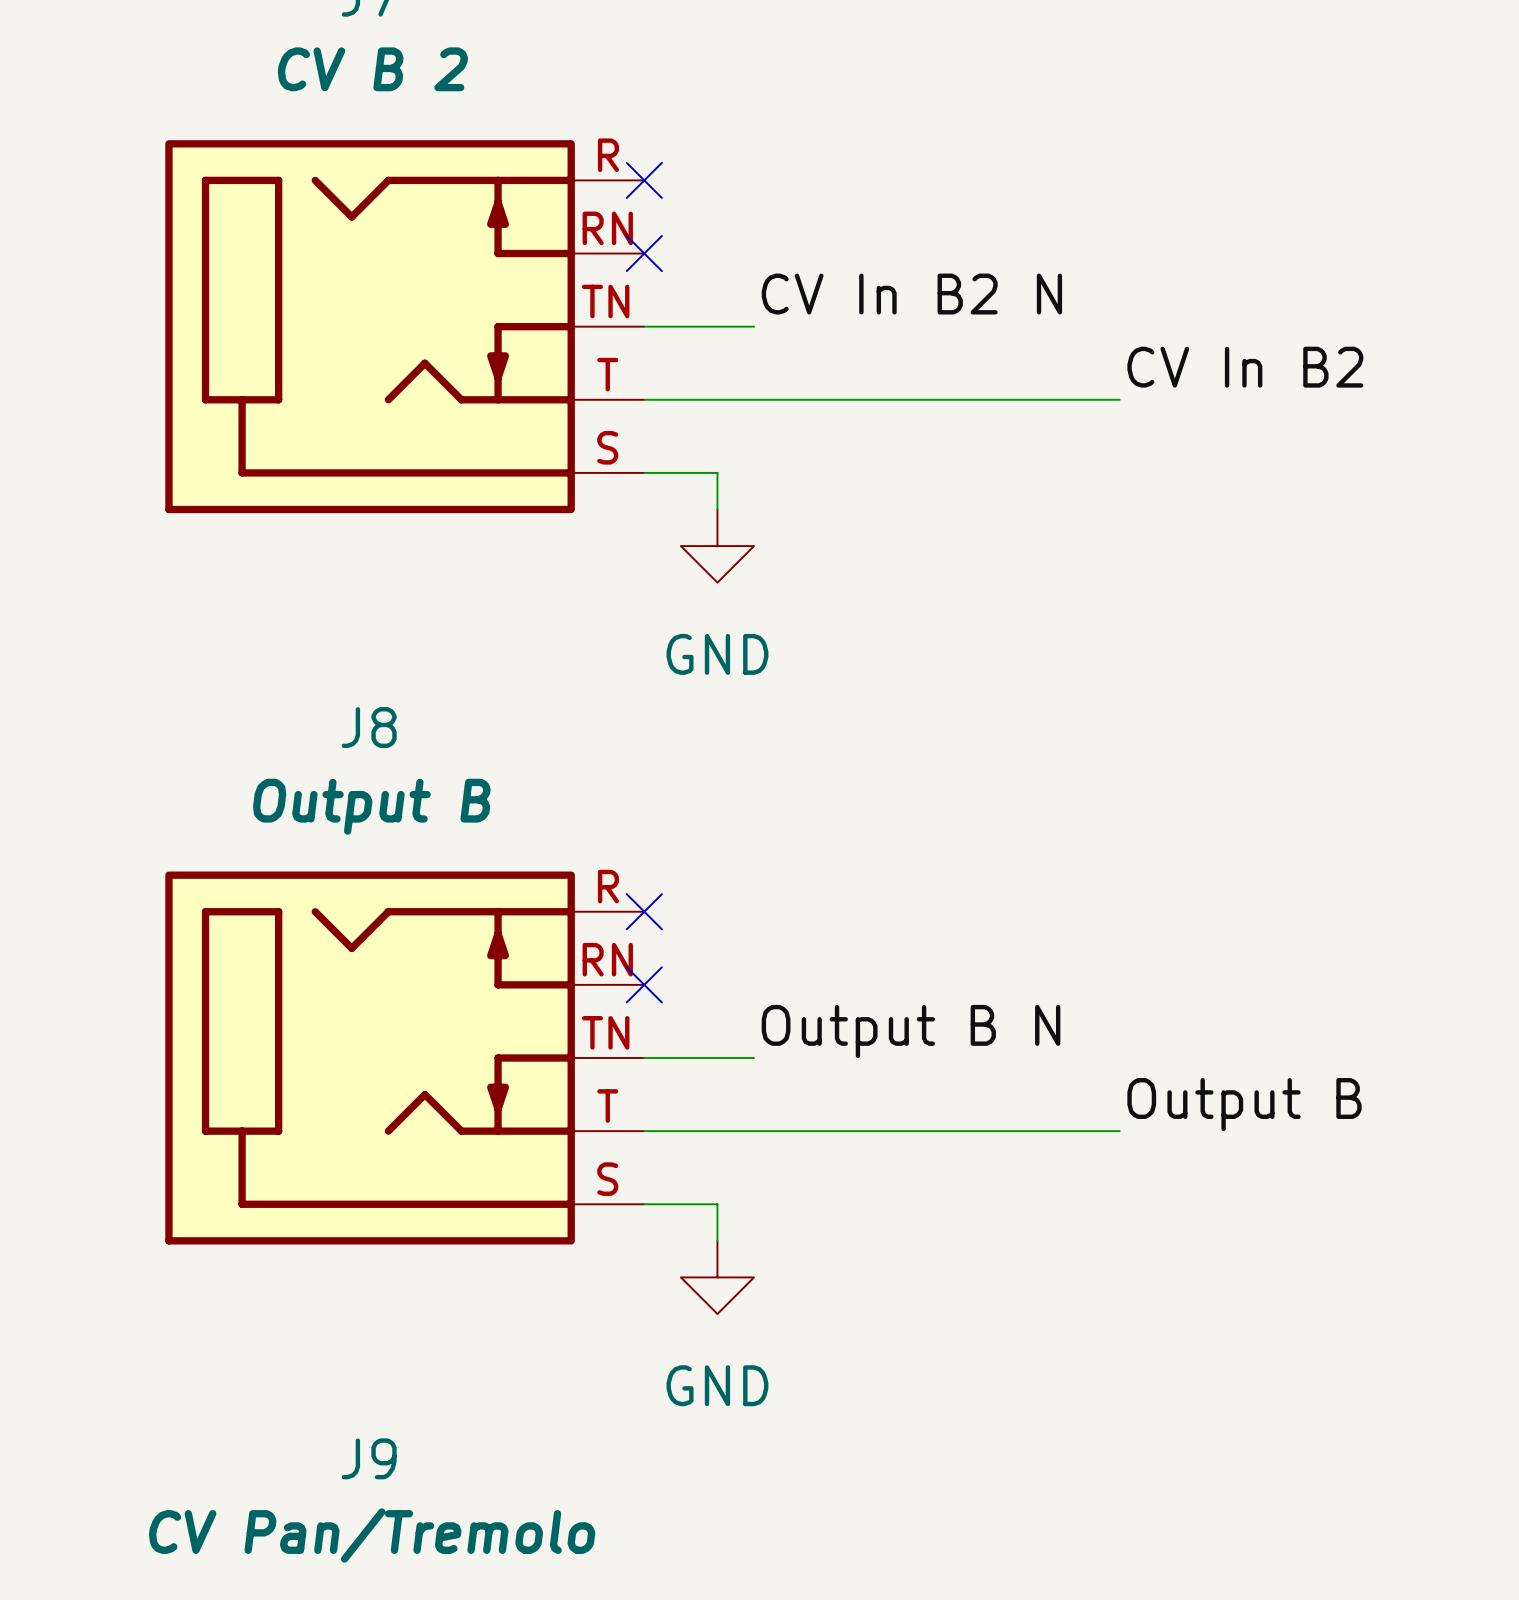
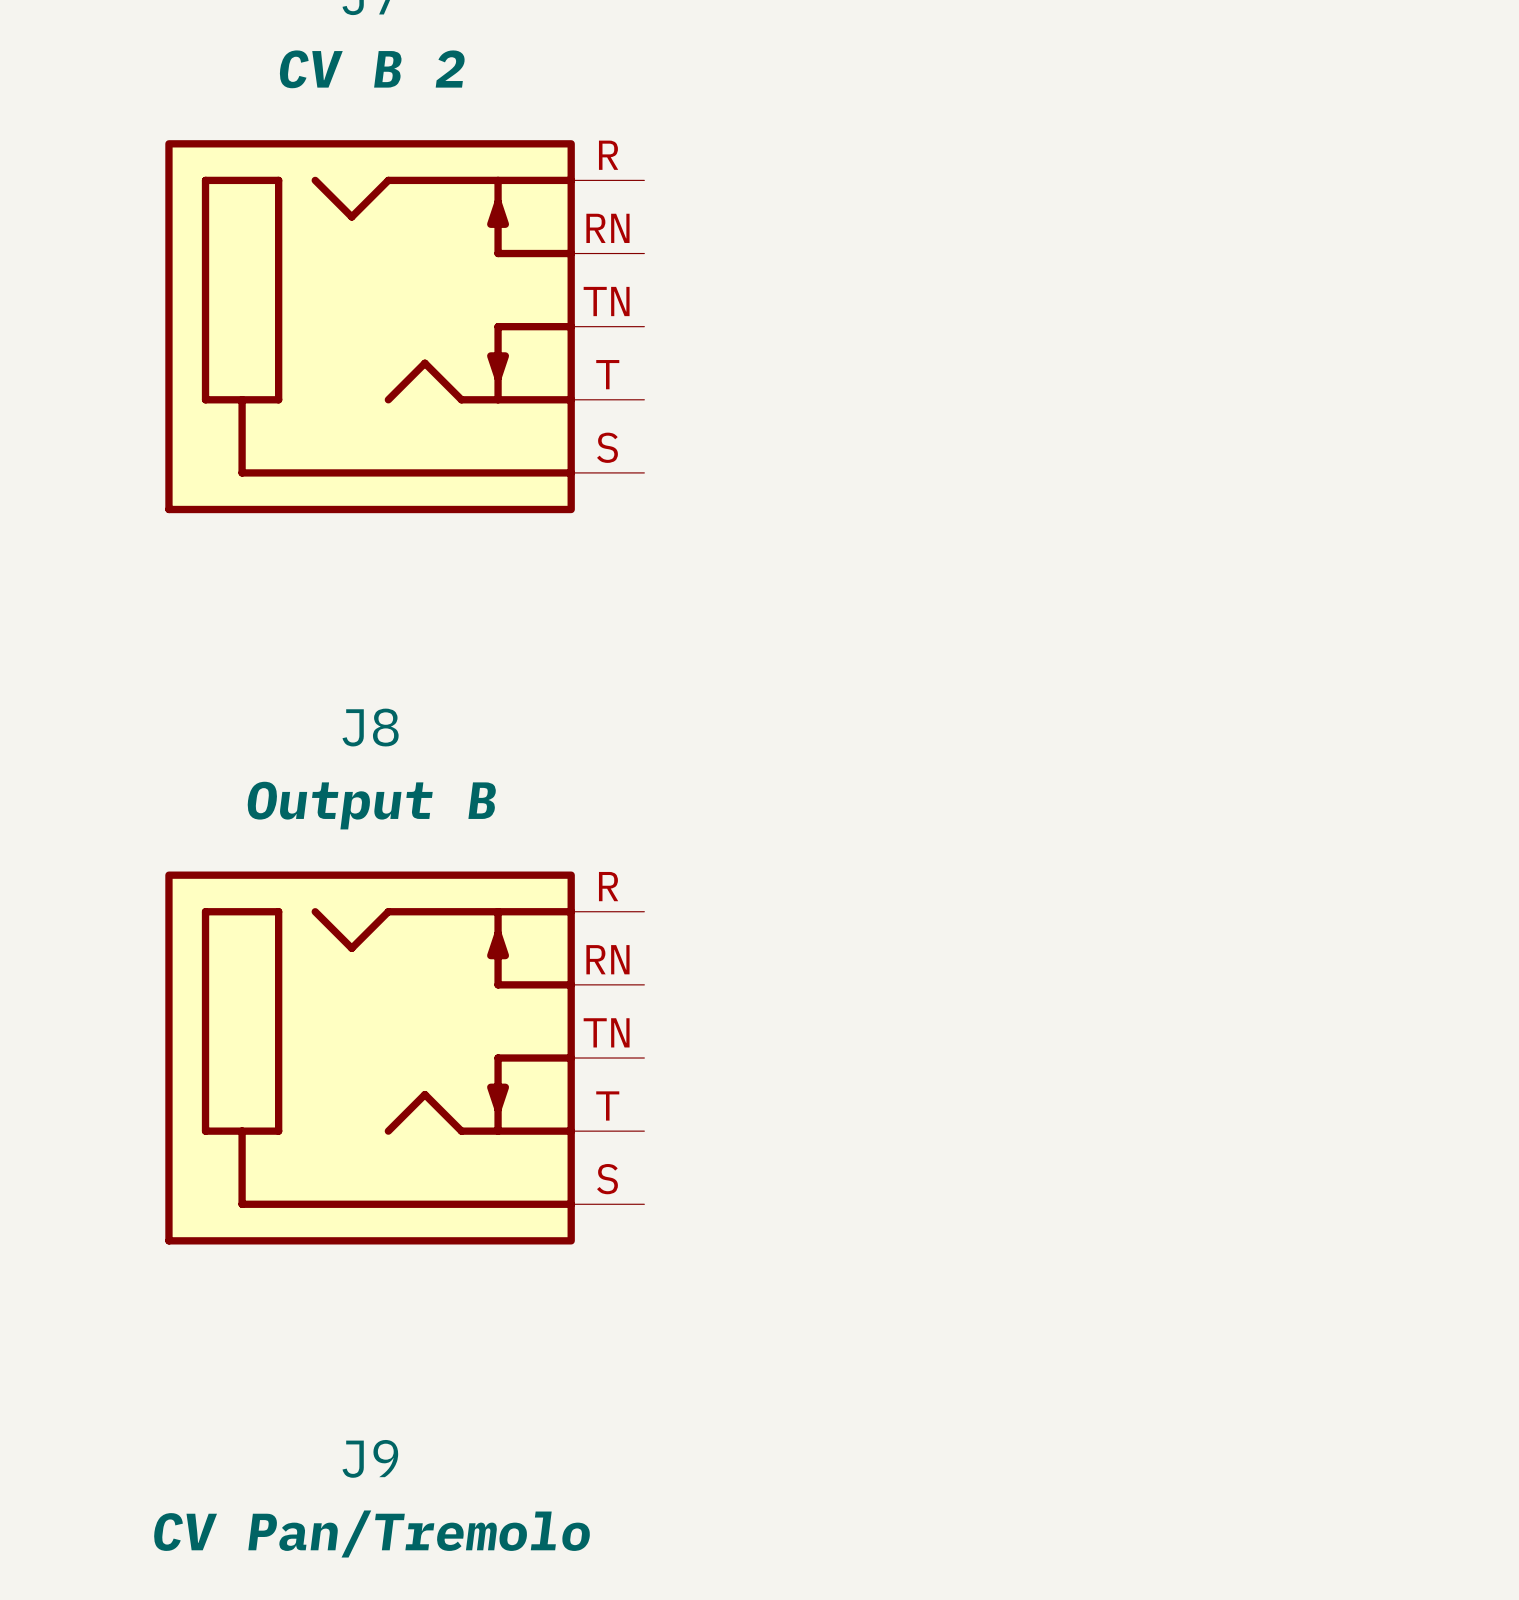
no-connect mark: (644, 180) -> none
no-connect mark: (644, 253) -> none
label: CV In B2 N (911, 294) -> none
wire: (644, 326) (754, 326) -> none
label: CV In B2 (1245, 367) -> none
wire: (644, 399) (1119, 399) -> none
wire: (644, 472) (717, 472) (717, 509) -> none
power symbol: GND (717, 546) -> none
no-connect mark: (644, 911) -> none
no-connect mark: (644, 984) -> none
label: Output B N (911, 1031) -> none
wire: (644, 1058) (754, 1058) -> none
label: Output B (1244, 1104) -> none
wire: (644, 1131) (1119, 1131) -> none
wire: (644, 1204) (717, 1204) (717, 1240) -> none
power symbol: GND (717, 1277) -> none

